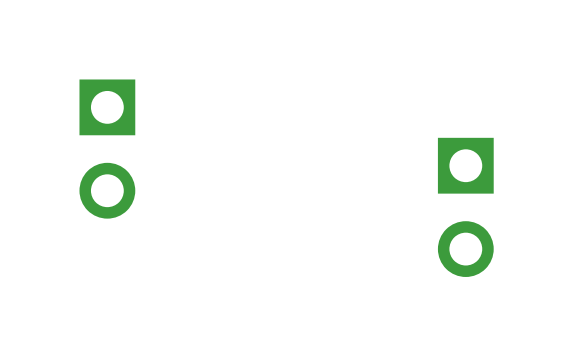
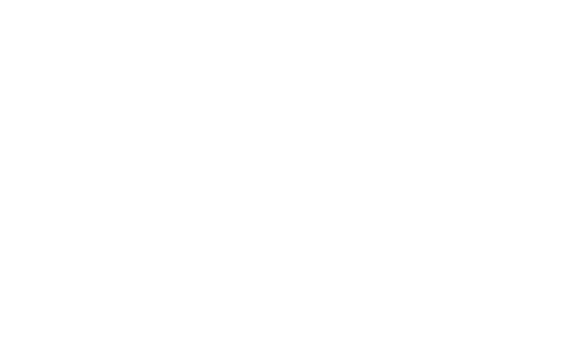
part: (107, 149) -> none
part: (465, 207) -> none

